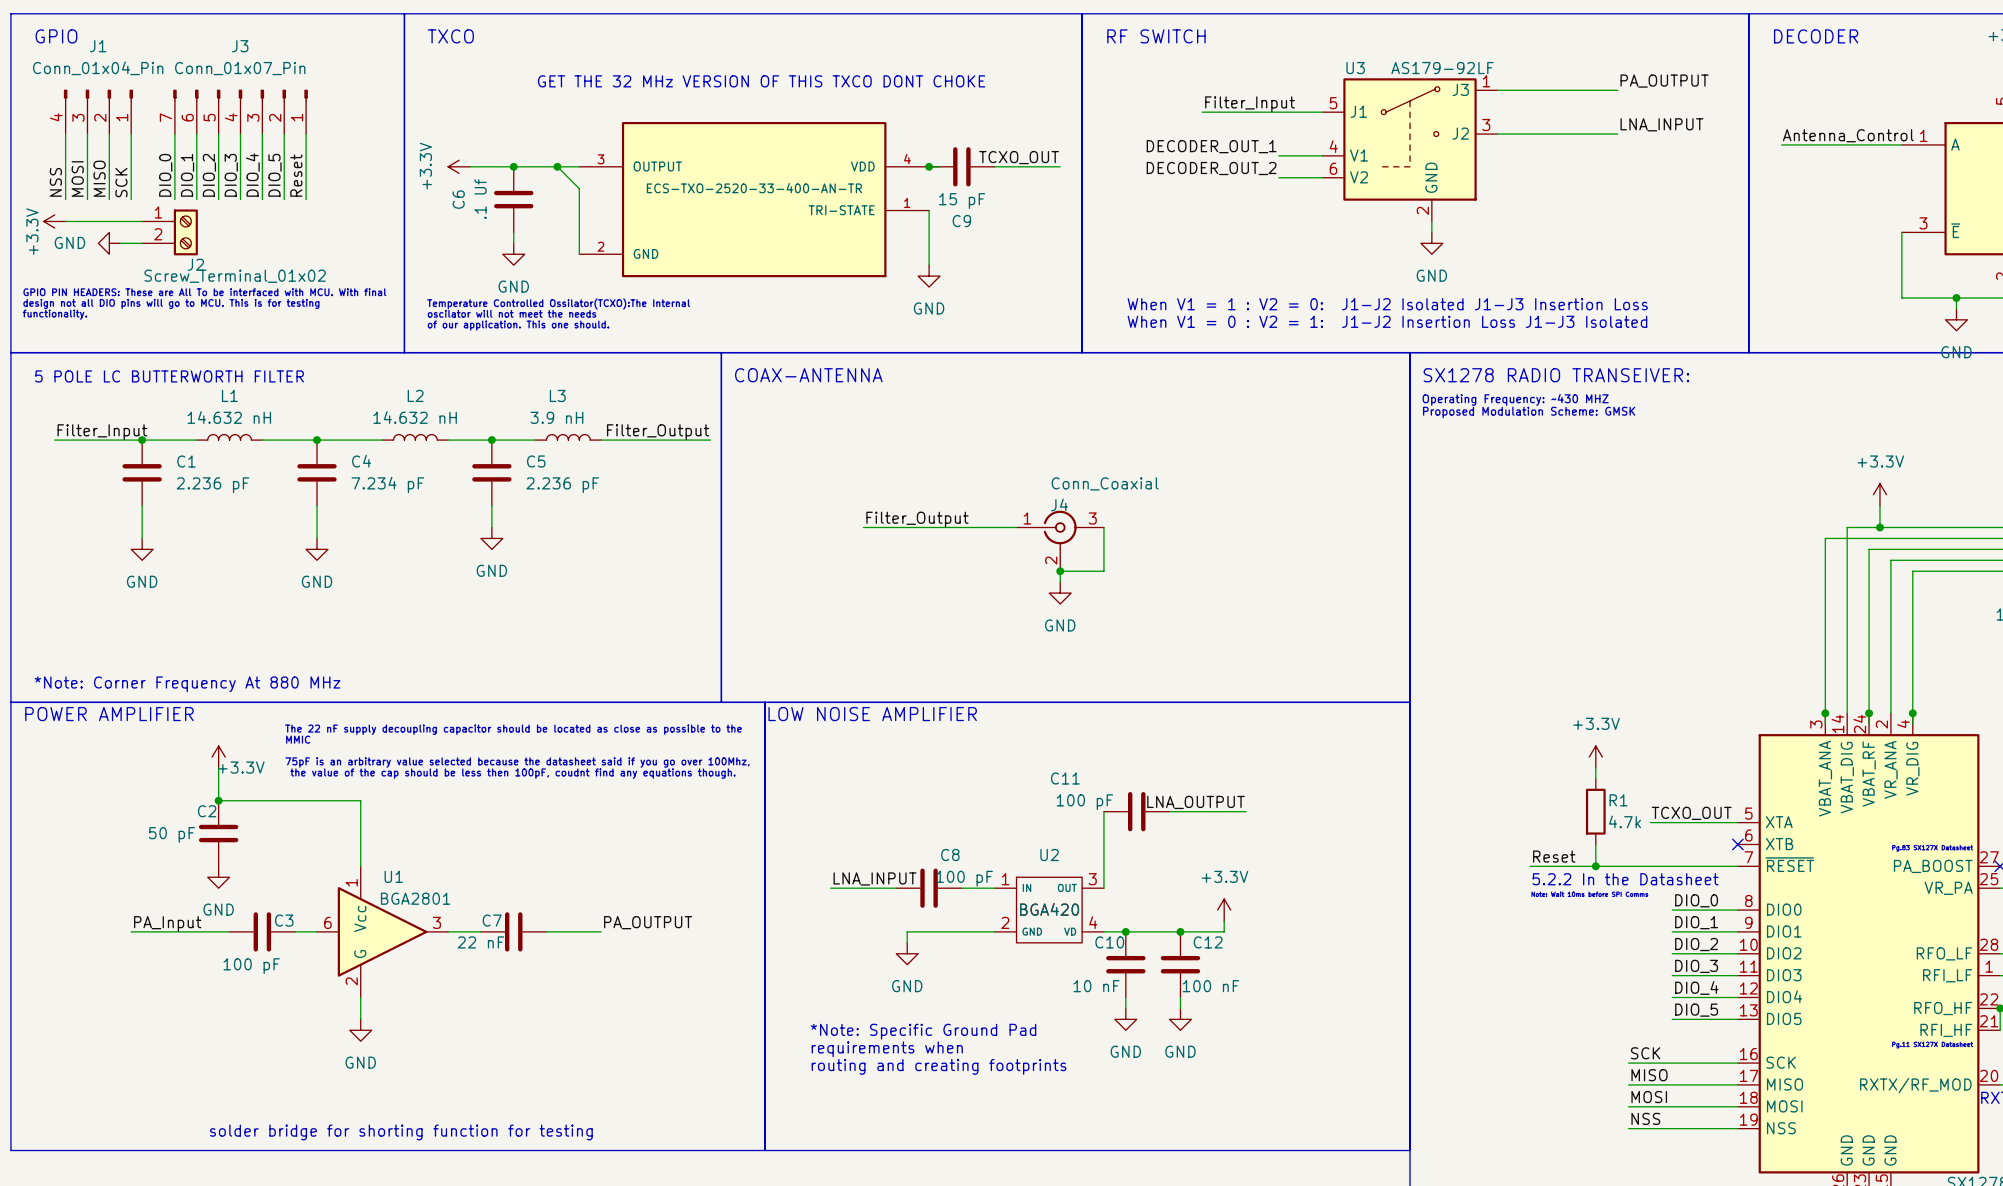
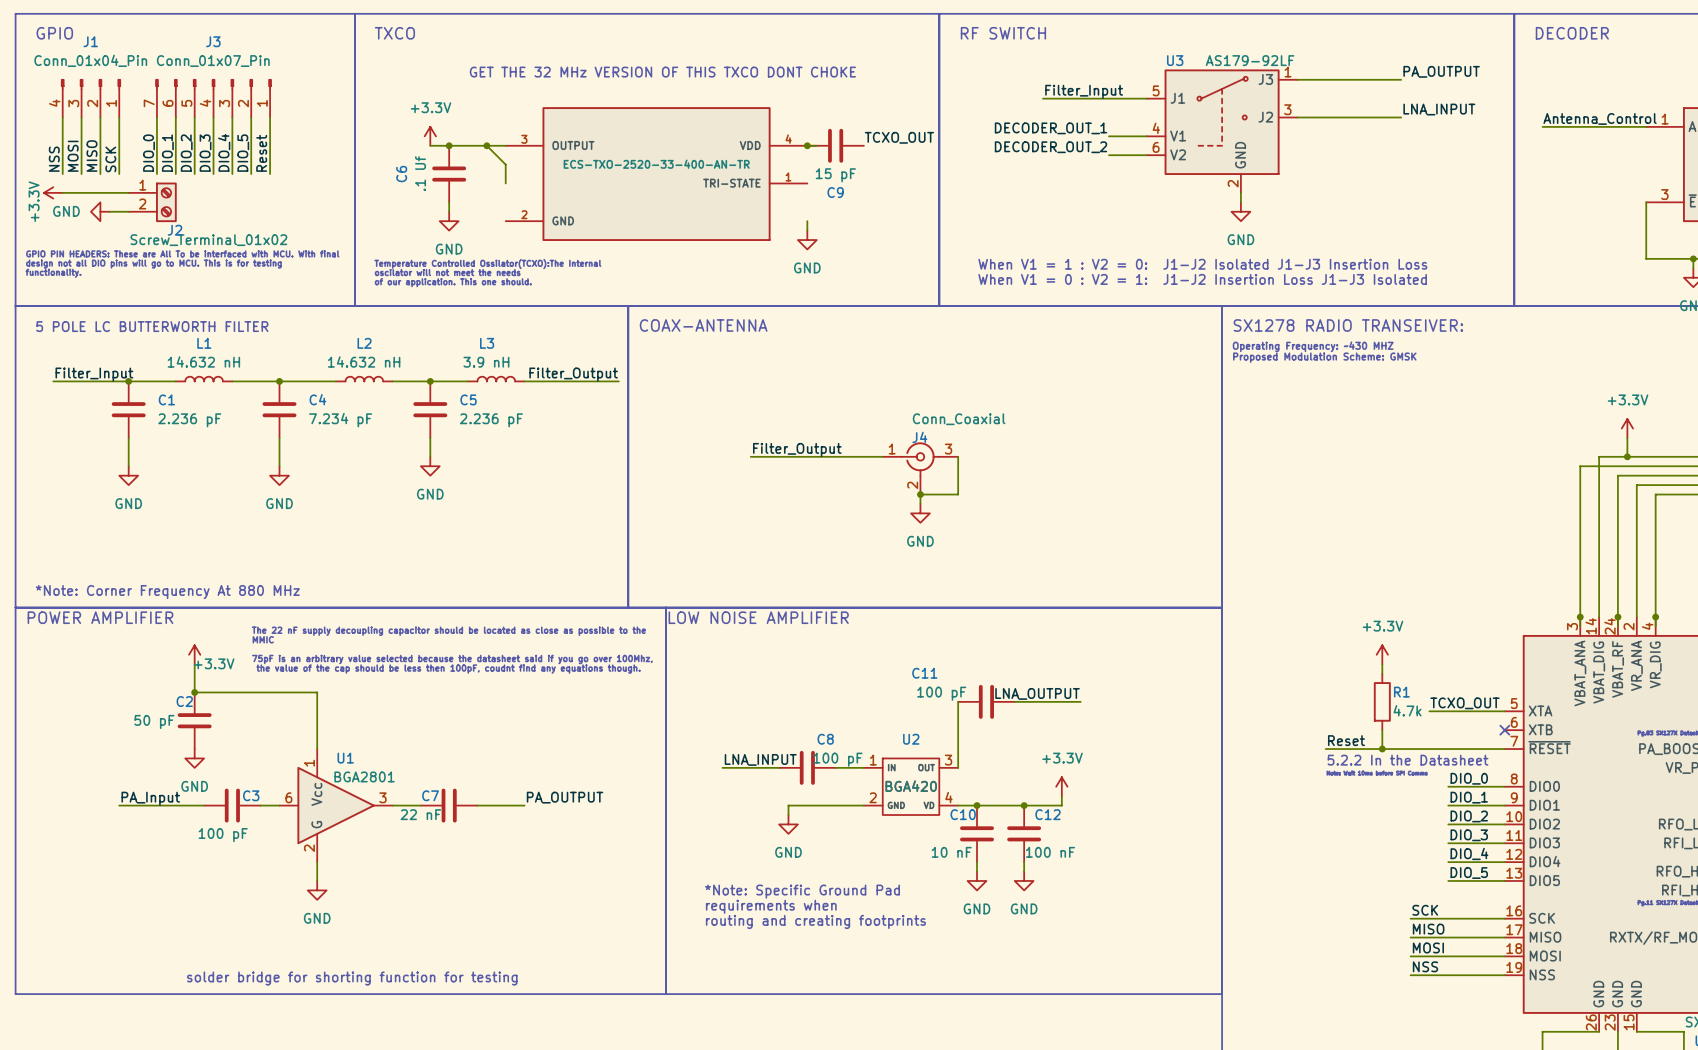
label position: TCXO_OUT (1019, 157) -> TCXO_OUT (899, 137)
power symbol rotation: 0° (459, 166) -> 90° clockwise (430, 136)
power symbol position: +3.3V (459, 166) -> +3.3V (430, 136)
wire: (470, 166) (491, 166) -> none
wire: (994, 166) (1060, 166) -> none
wire: (579, 210) (579, 254) -> none
wire: (929, 210) (929, 254) -> none

